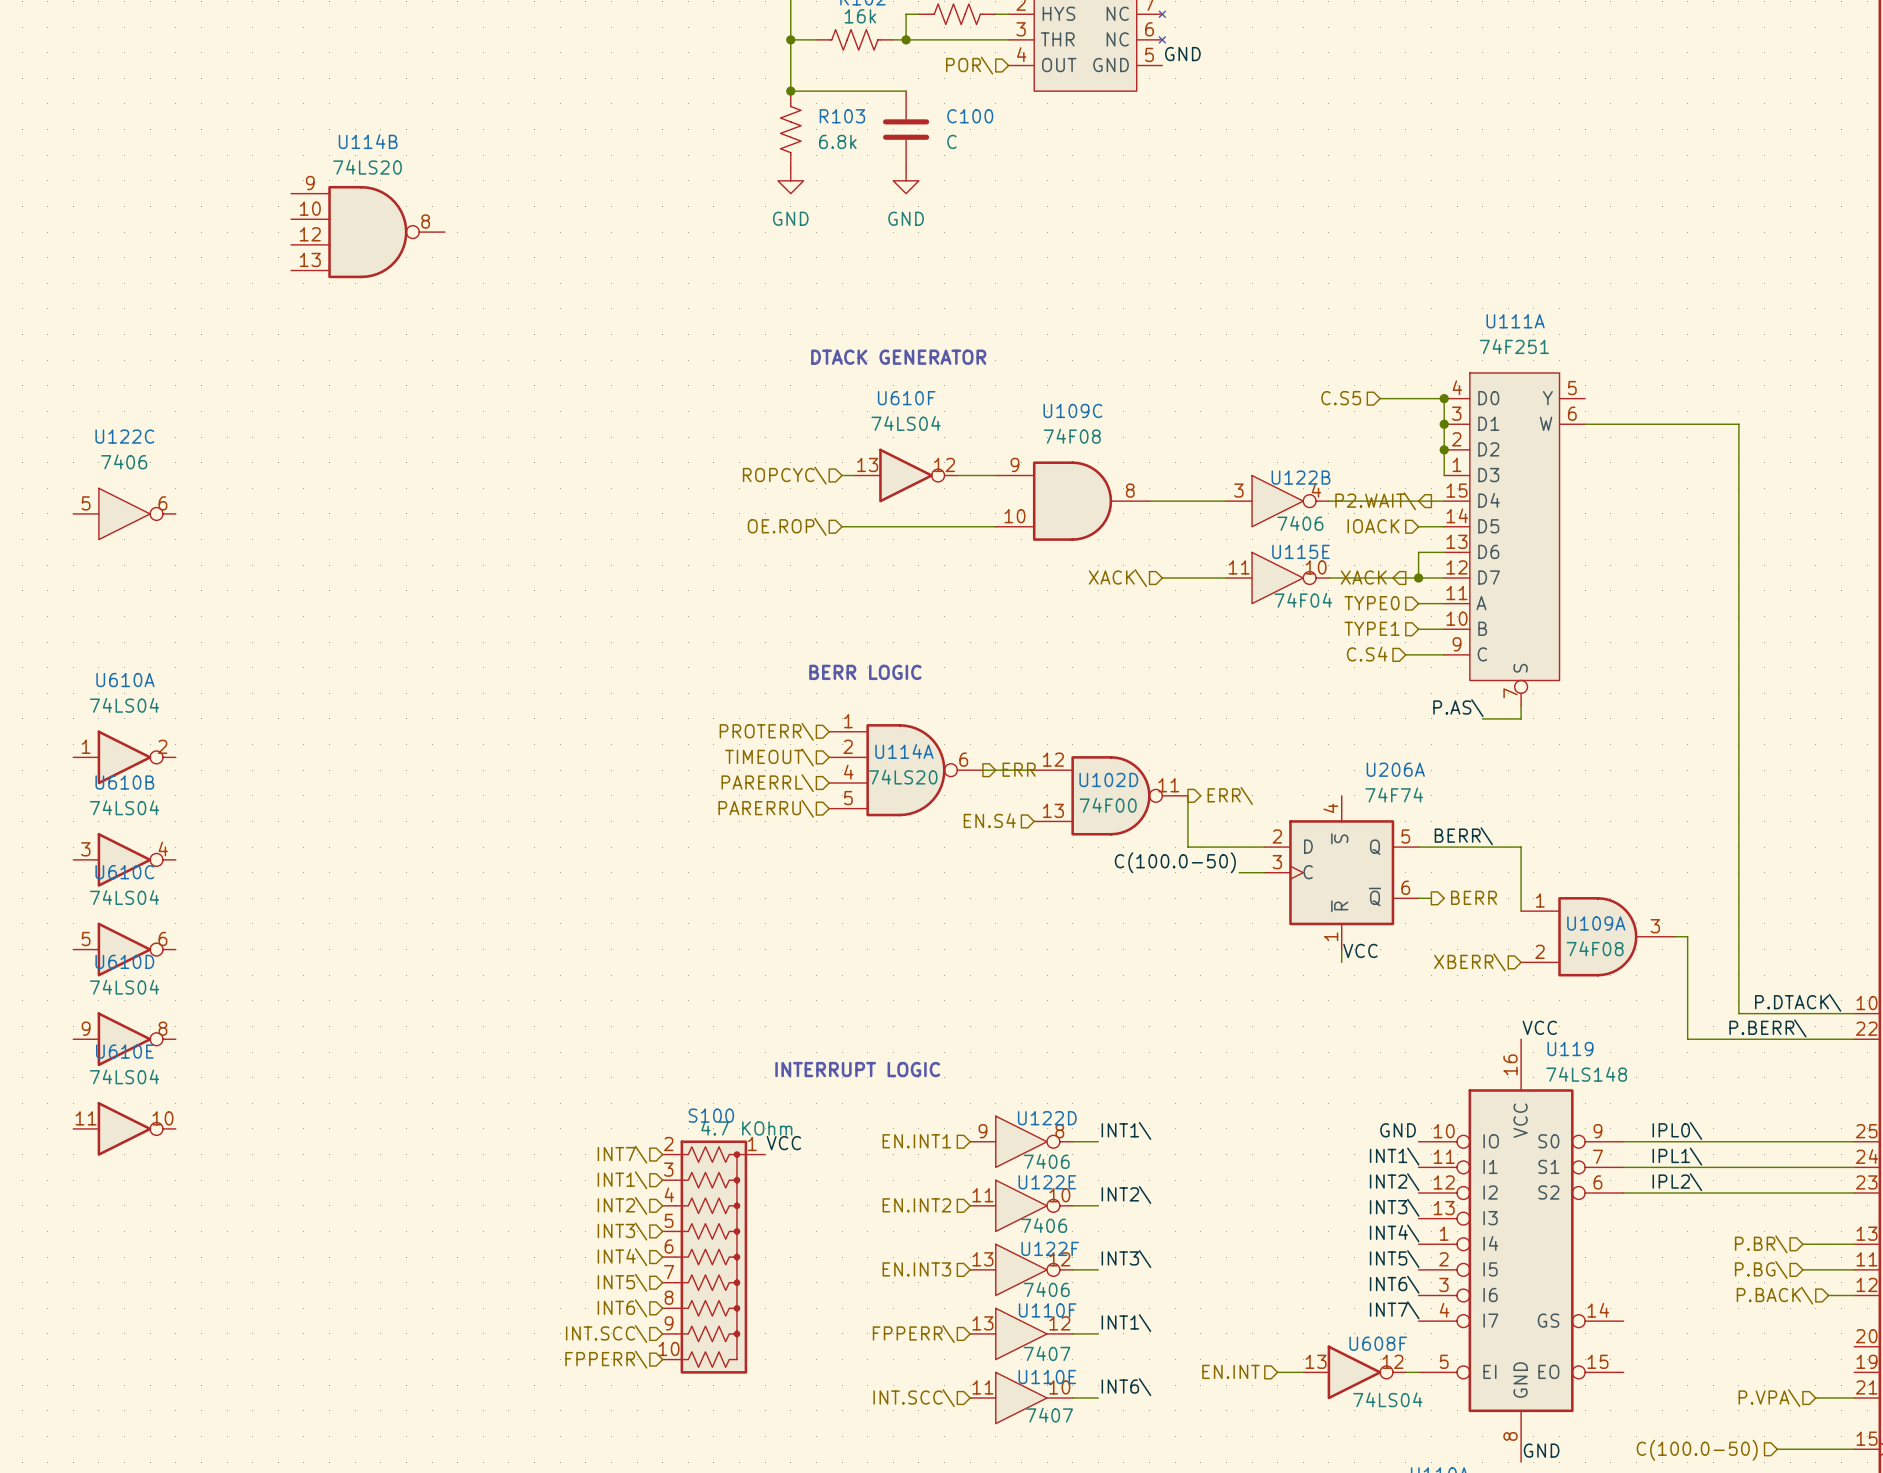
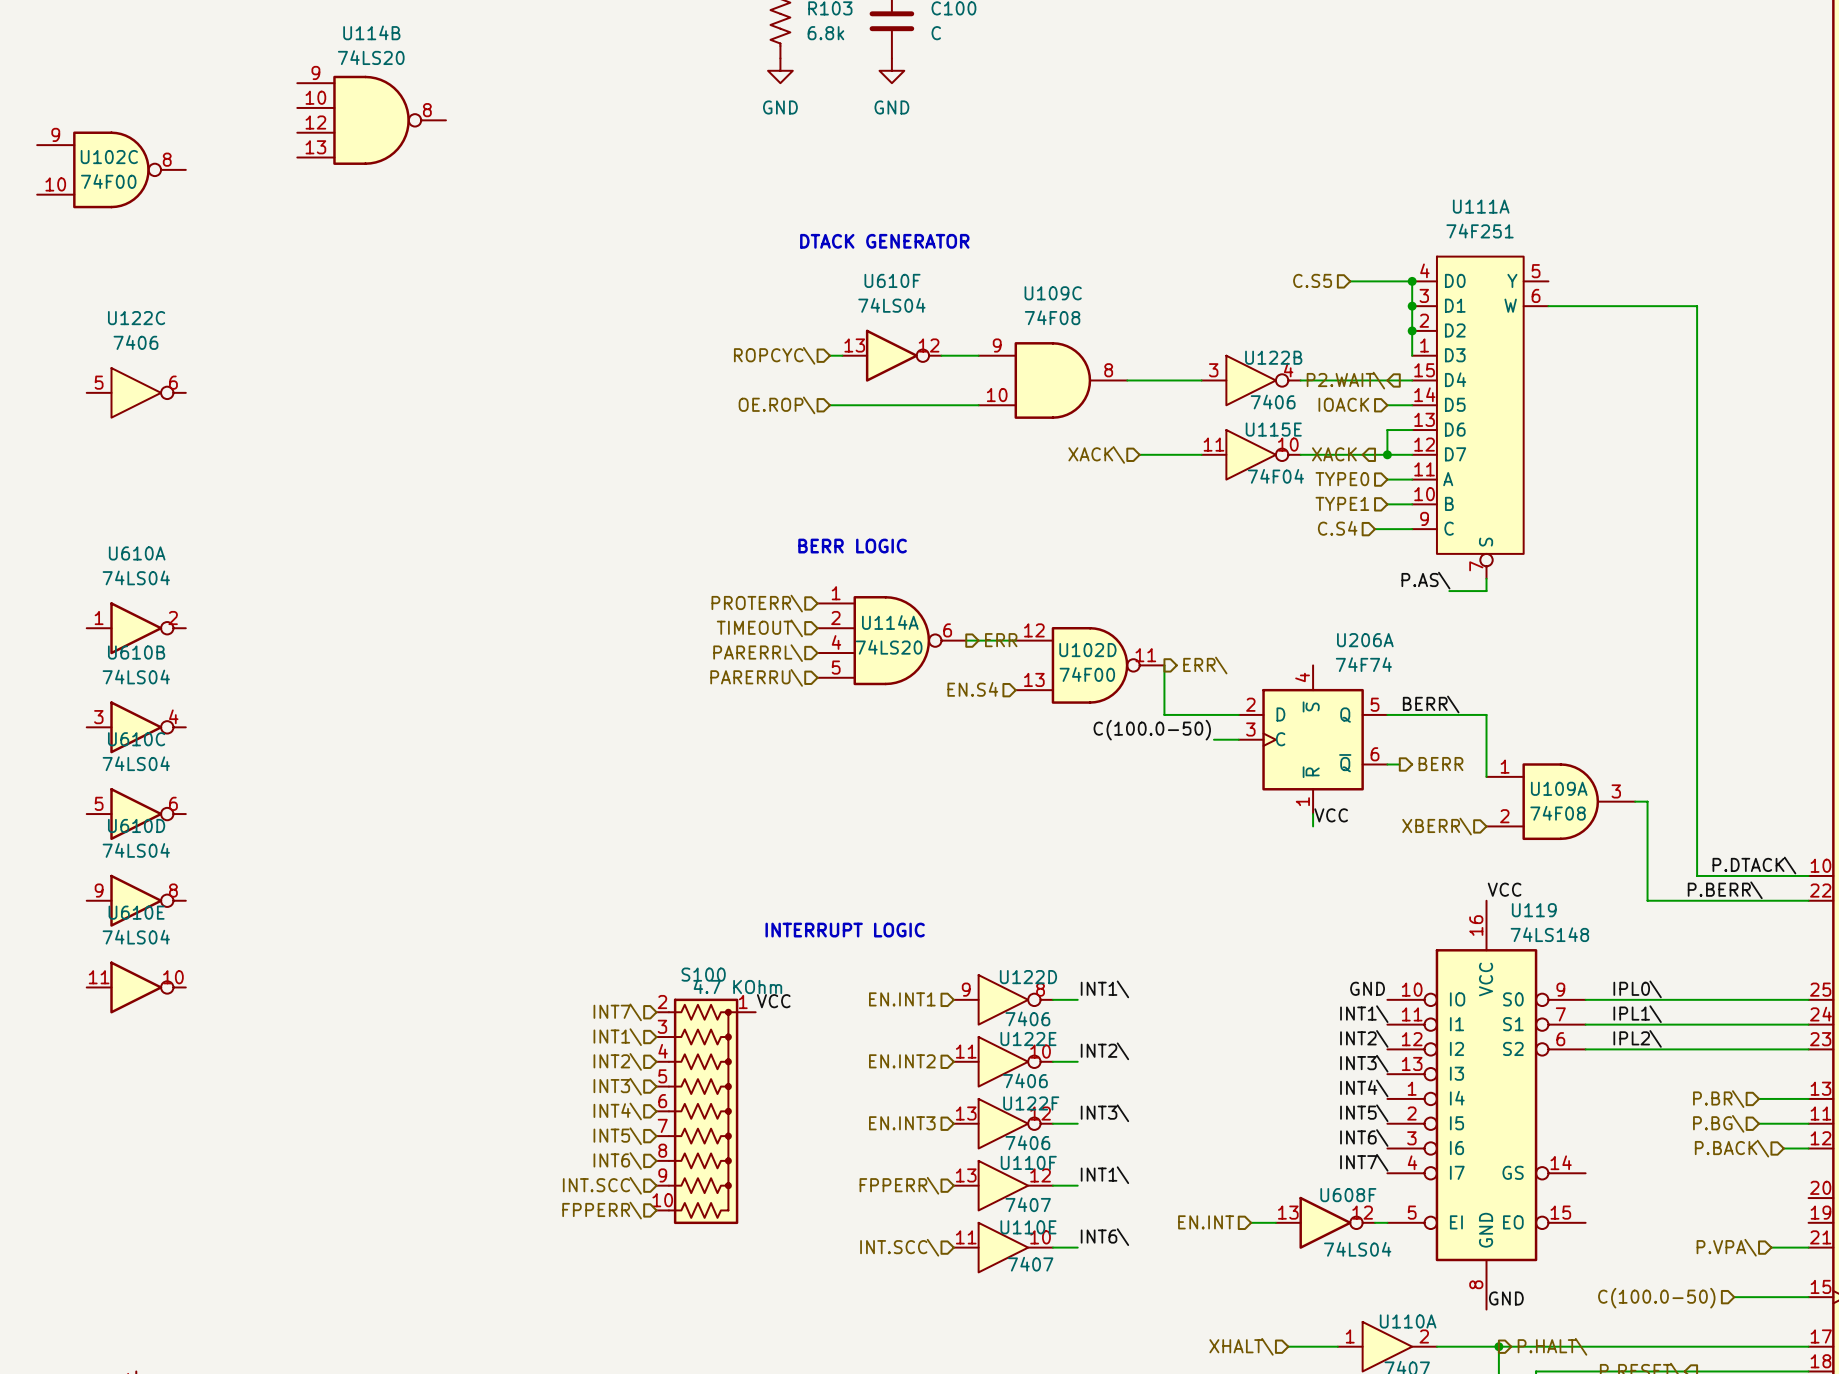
U102C: none -> 74F00 (111, 169)

